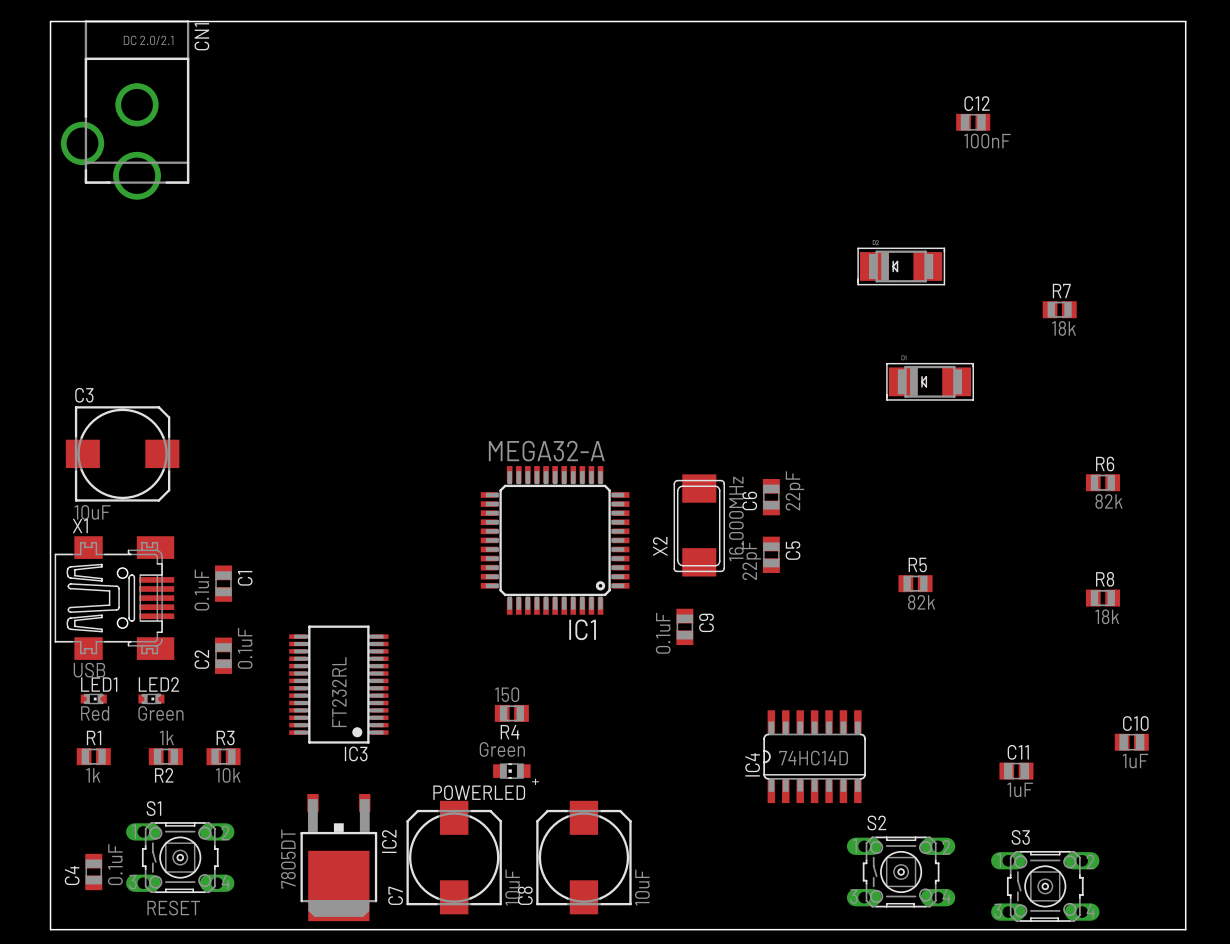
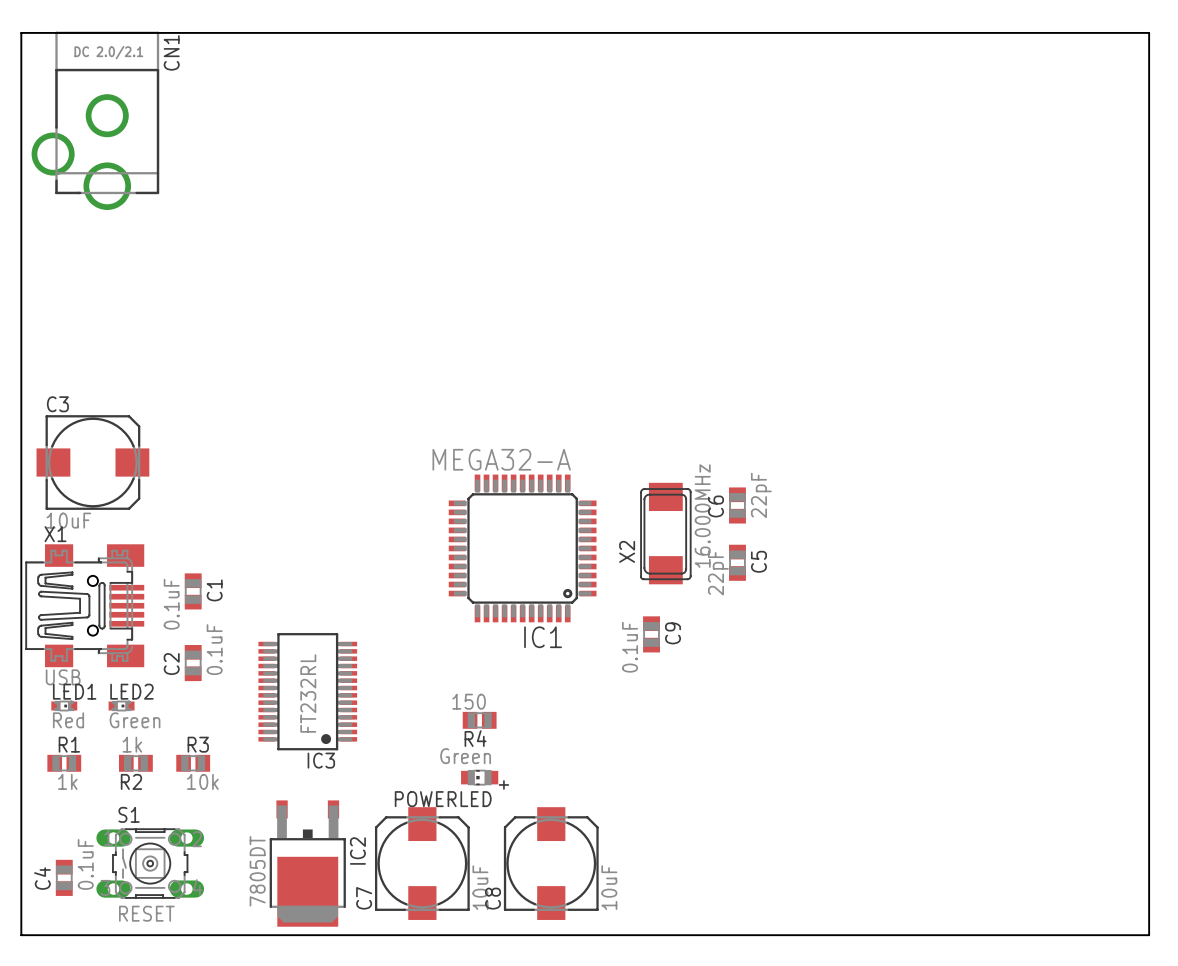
C12: 100nF (973, 122) -> none
part: (901, 266) -> none
R7: 18k (1059, 309) -> none
part: (930, 381) -> none
R6: 82k (1102, 482) -> none
R5: 82k (915, 583) -> none
R8: 18k (1102, 598) -> none
C10: 1uF (1131, 742) -> none
IC4: 74HC14D (814, 756) -> none
C11: 1uF (1016, 771) -> none
S2: (901, 872) -> none
S3: (1045, 886) -> none

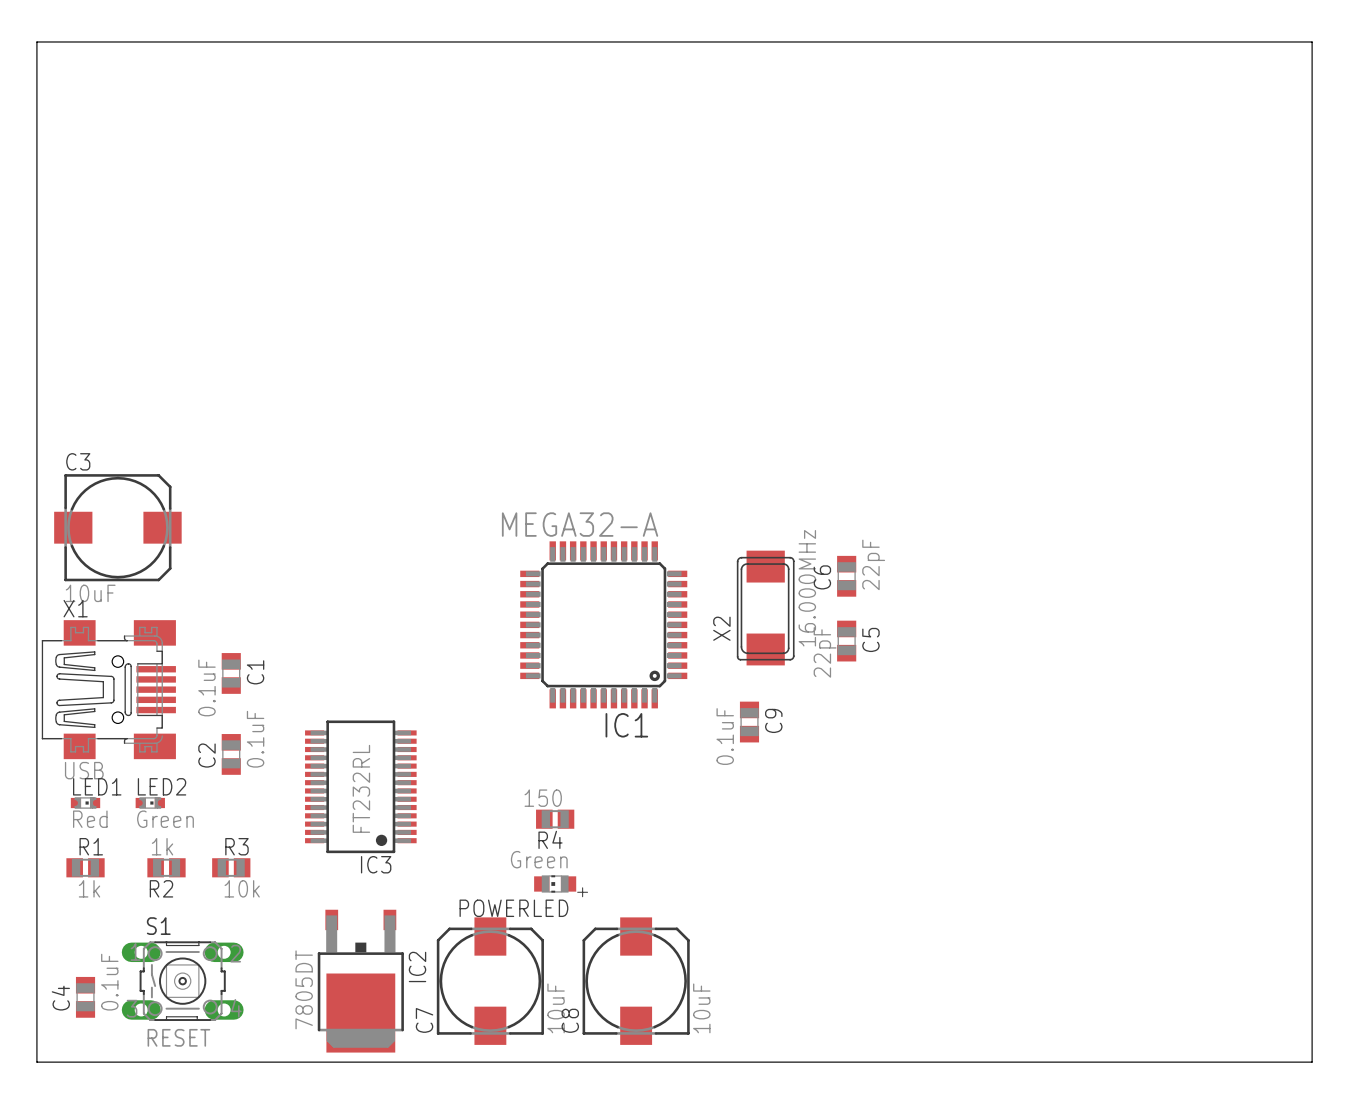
CN1: (95, 120) -> none

